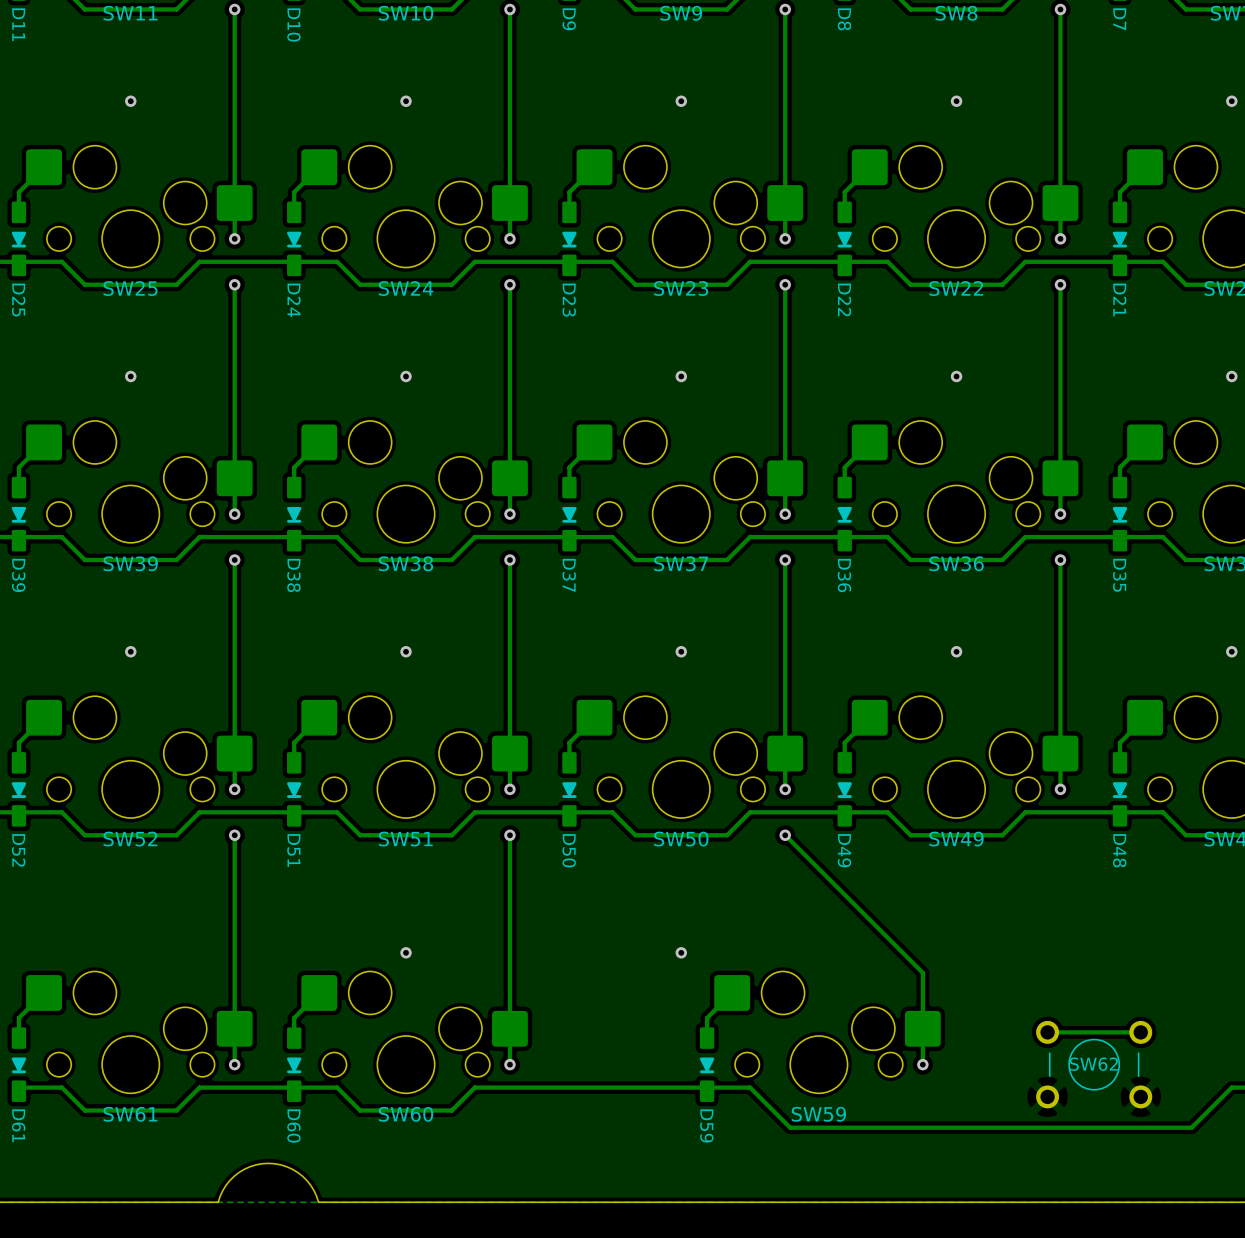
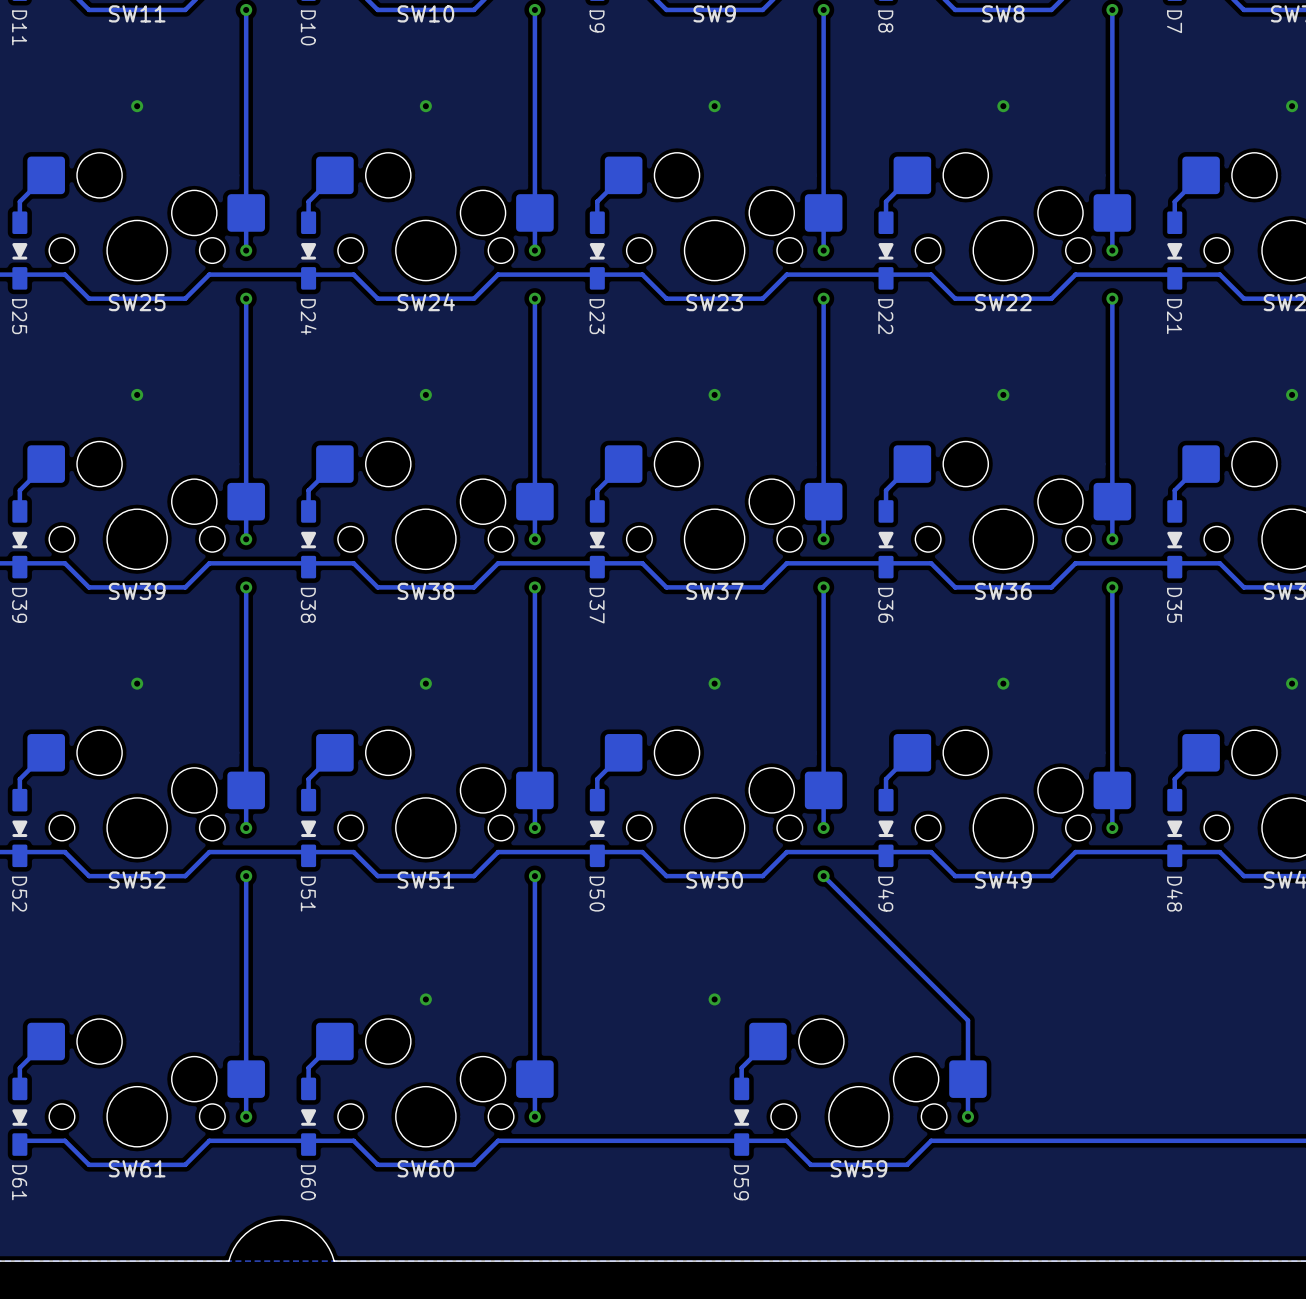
track: (1140, 1032) (1047, 1032) -> none
SW62: (1094, 1064) -> none
track: (1231, 1087) (1191, 1127) (790, 1127) (773, 1110) -> (1292, 1140) (931, 1140) (907, 1164) (810, 1164)

